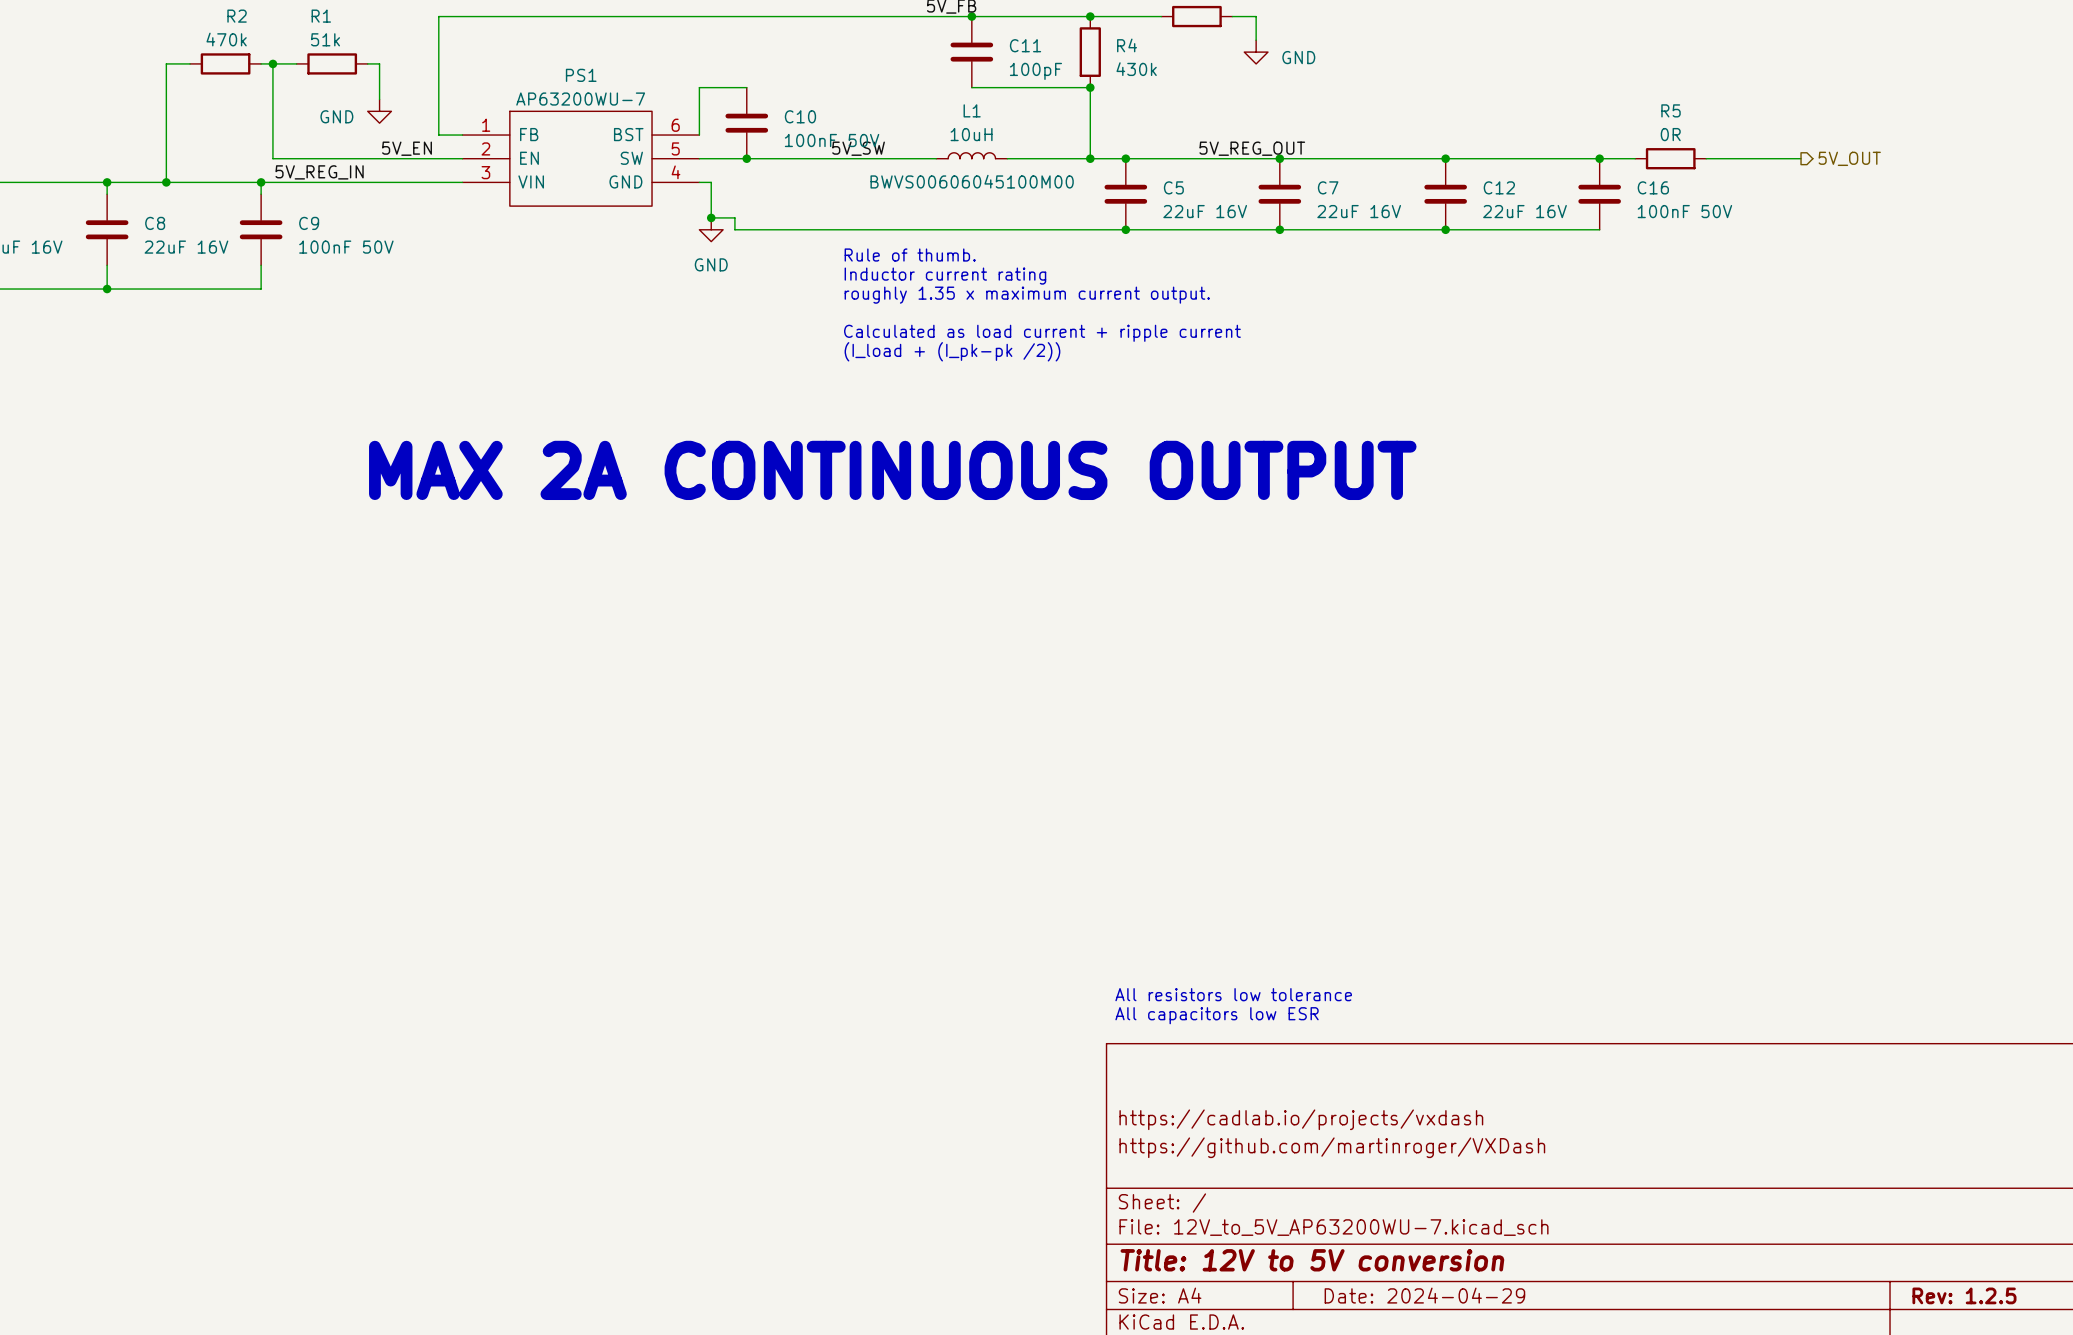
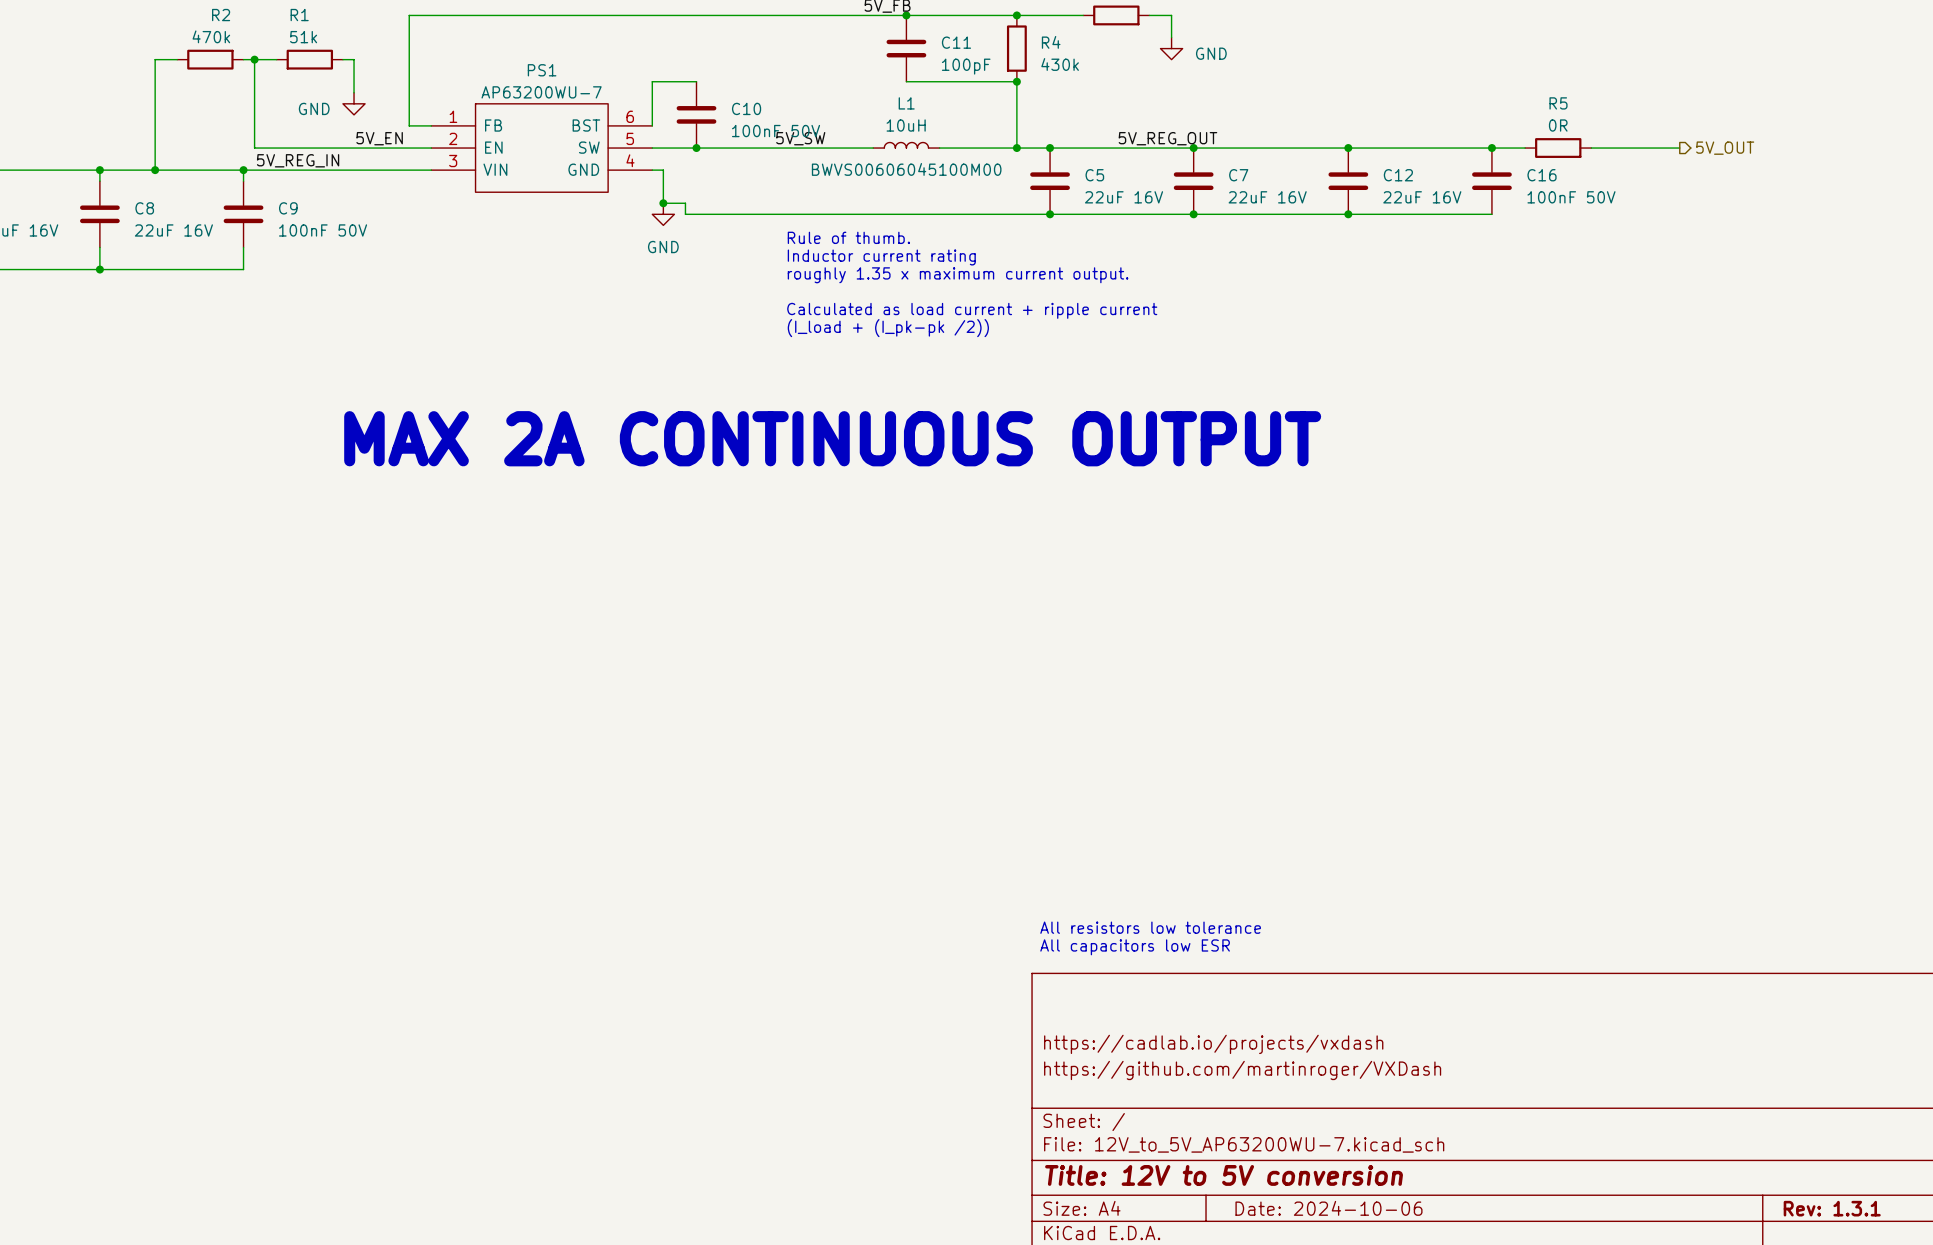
title block: Date: 2024-04-29 (1424, 1295) -> Date: 2024-10-06 (1328, 1208)
title block: Rev: 1.2.5 (1964, 1295) -> Rev: 1.3.1 (1832, 1208)

